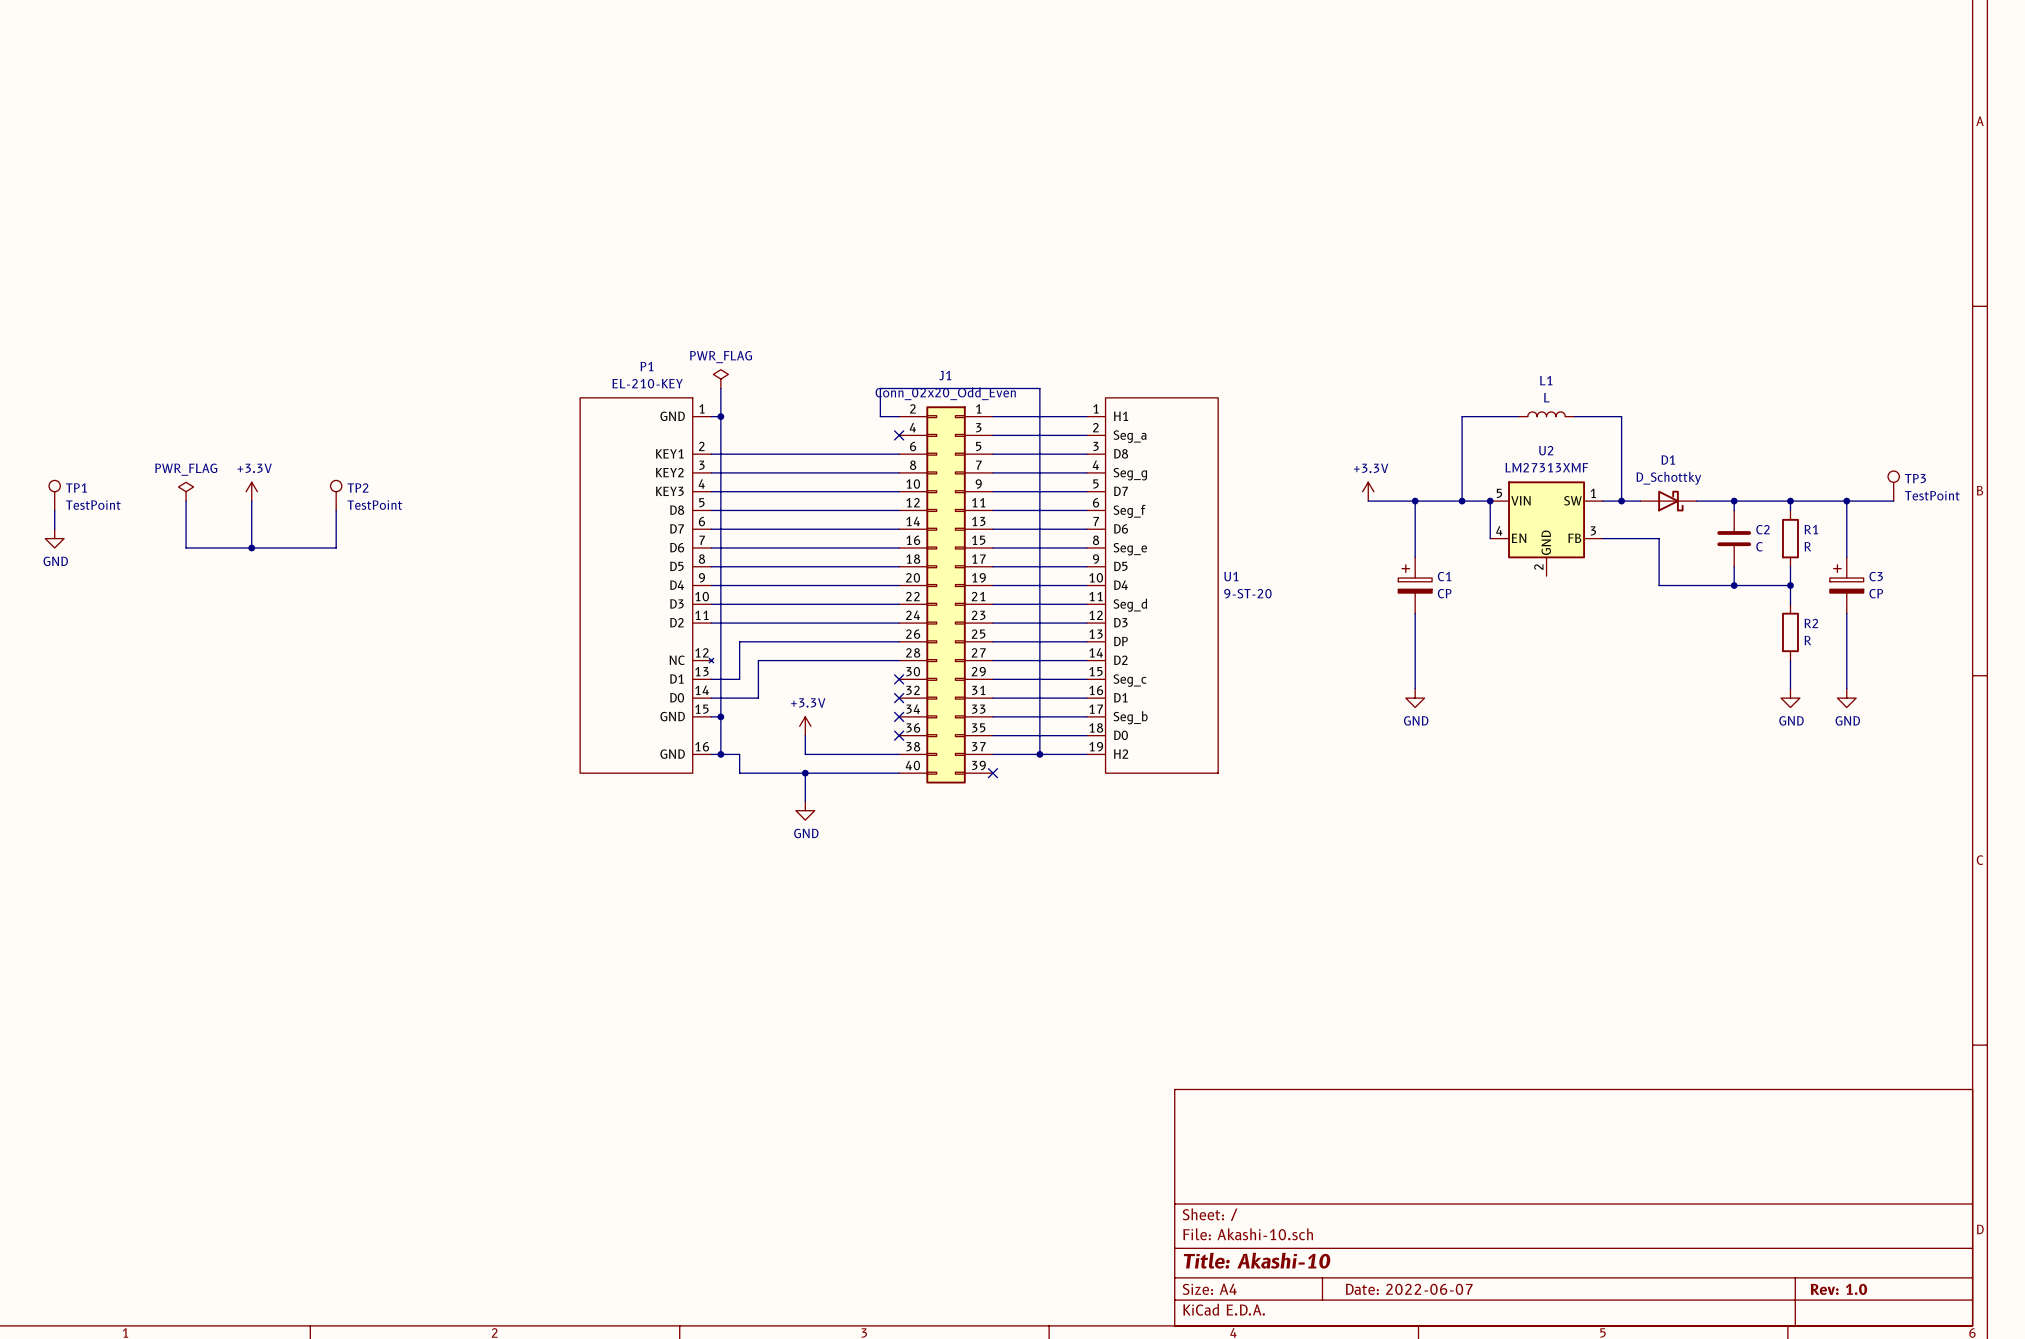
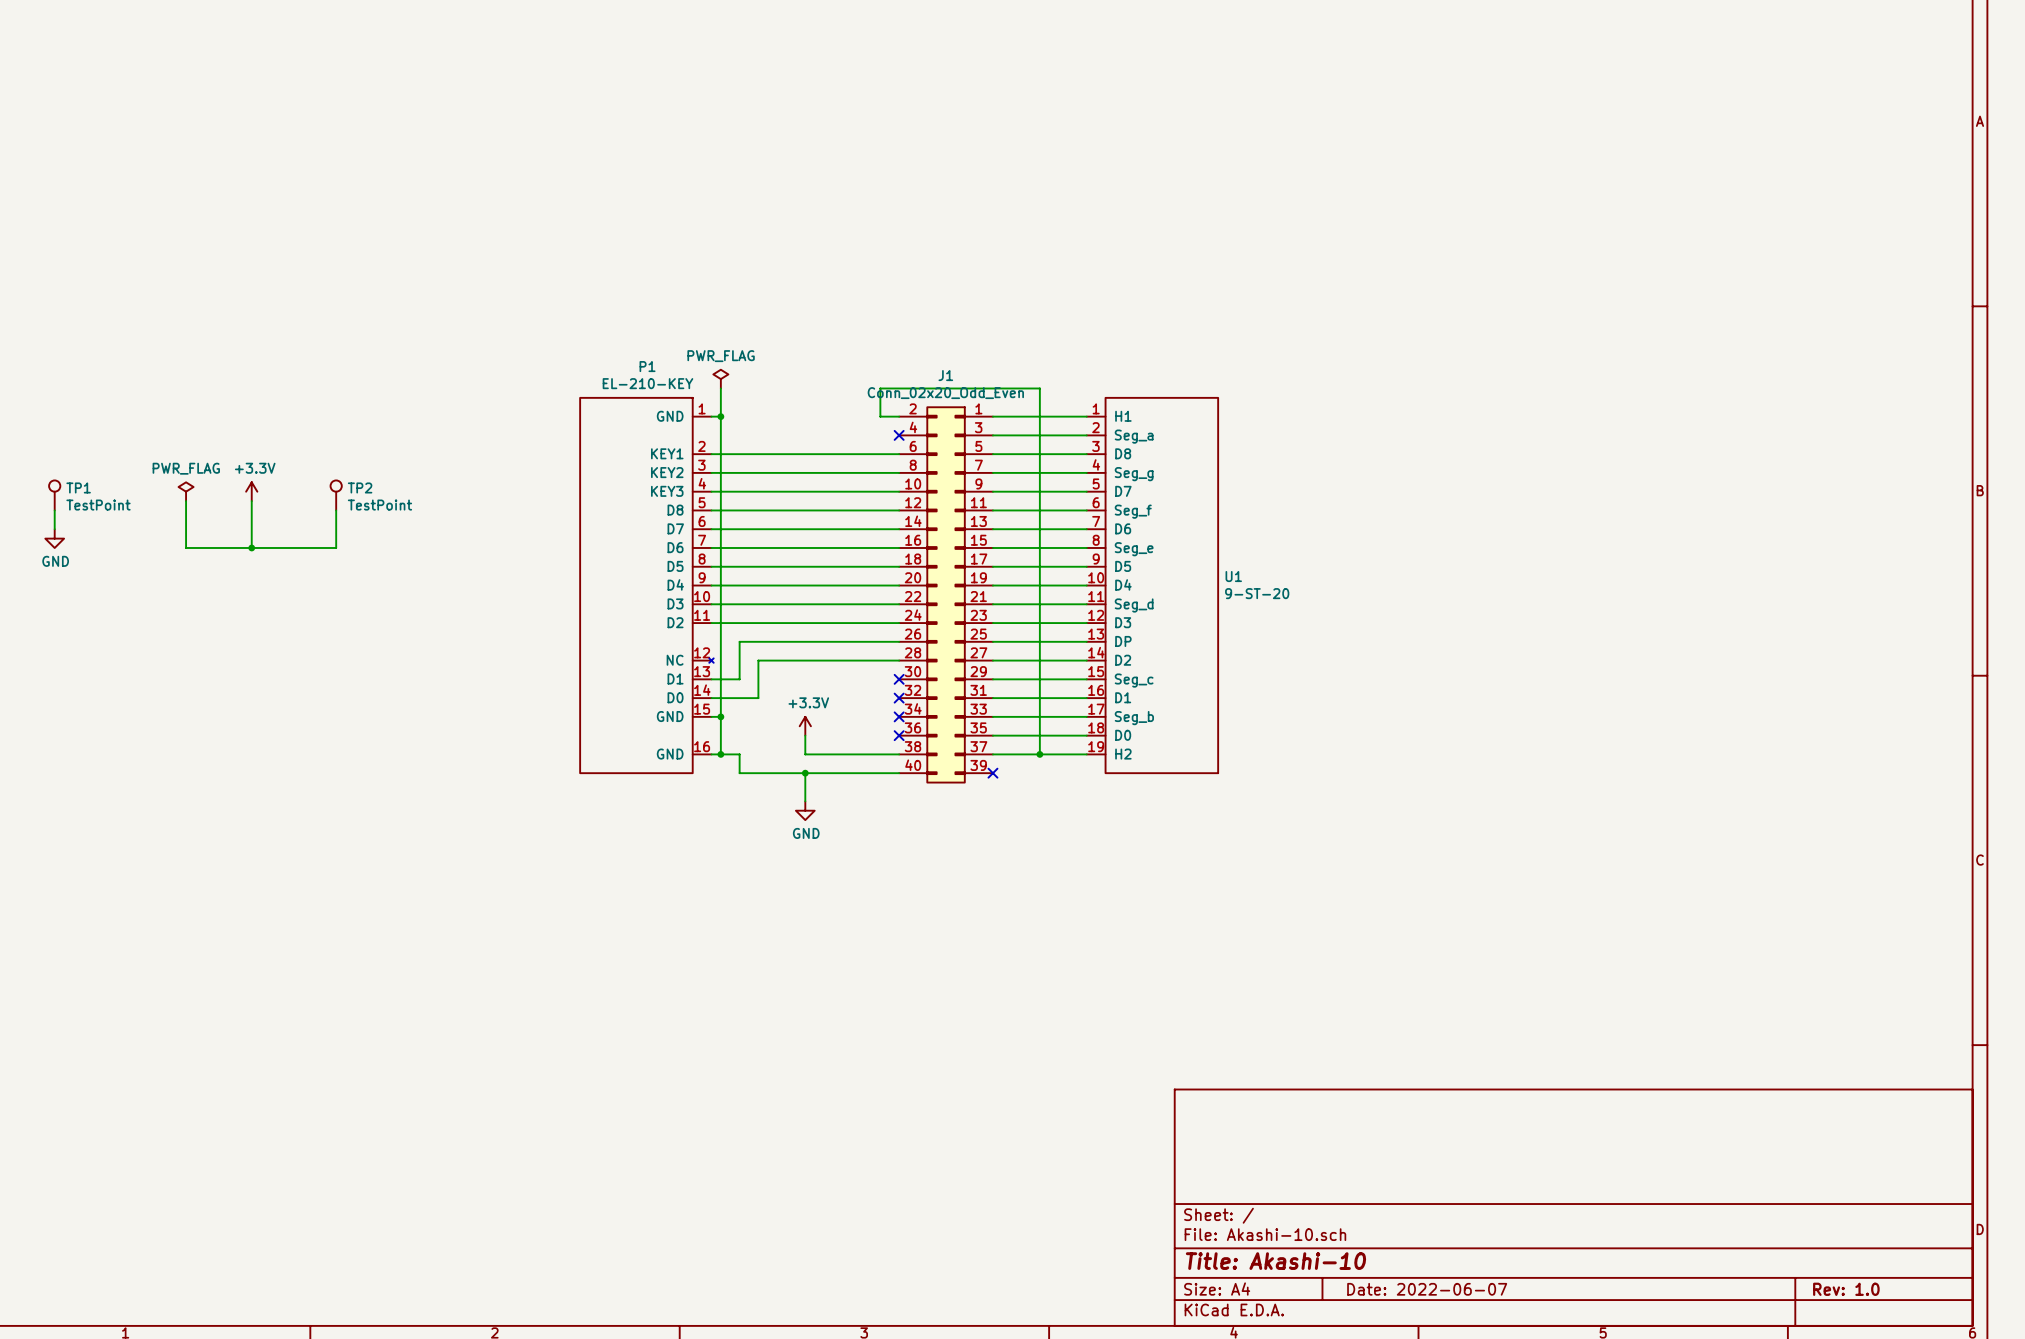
L1: L (1546, 414) -> none
wire: (1518, 416) (1462, 416) (1462, 501) -> none
wire: (1574, 416) (1621, 416) (1621, 501) -> none
TP3: TestPoint (1893, 486) -> none
power symbol: +3.3V (1368, 491) -> none
wire: (1368, 501) (1490, 501) (1490, 538) -> none
wire: (1415, 501) (1415, 557) -> none
junction: (1415, 501) -> none
junction: (1462, 501) -> none
junction: (1490, 501) -> none
wire: (1602, 501) (1640, 501) -> none
junction: (1621, 501) -> none
D1: D_Schottky (1668, 501) -> none
wire: (1696, 501) (1893, 501) -> none
wire: (1734, 501) (1734, 510) -> none
junction: (1734, 501) -> none
wire: (1790, 501) (1790, 510) -> none
junction: (1790, 501) -> none
wire: (1846, 501) (1846, 557) -> none
junction: (1846, 501) -> none
U2: LM27313XMF (1546, 528) -> none
wire: (1602, 538) (1659, 538) (1659, 585) (1790, 585) -> none
C2: C (1734, 538) -> none
R1: R (1790, 538) -> none
wire: (1734, 566) (1734, 585) -> none
wire: (1790, 566) (1790, 604) -> none
C1: CP (1415, 585) -> none
junction: (1734, 585) -> none
junction: (1790, 585) -> none
C3: CP (1846, 585) -> none
wire: (1415, 613) (1415, 688) -> none
wire: (1846, 613) (1846, 688) -> none
R2: R (1790, 632) -> none
wire: (1790, 660) (1790, 688) -> none
power symbol: GND (1415, 698) -> none
power symbol: GND (1790, 698) -> none
power symbol: GND (1846, 698) -> none

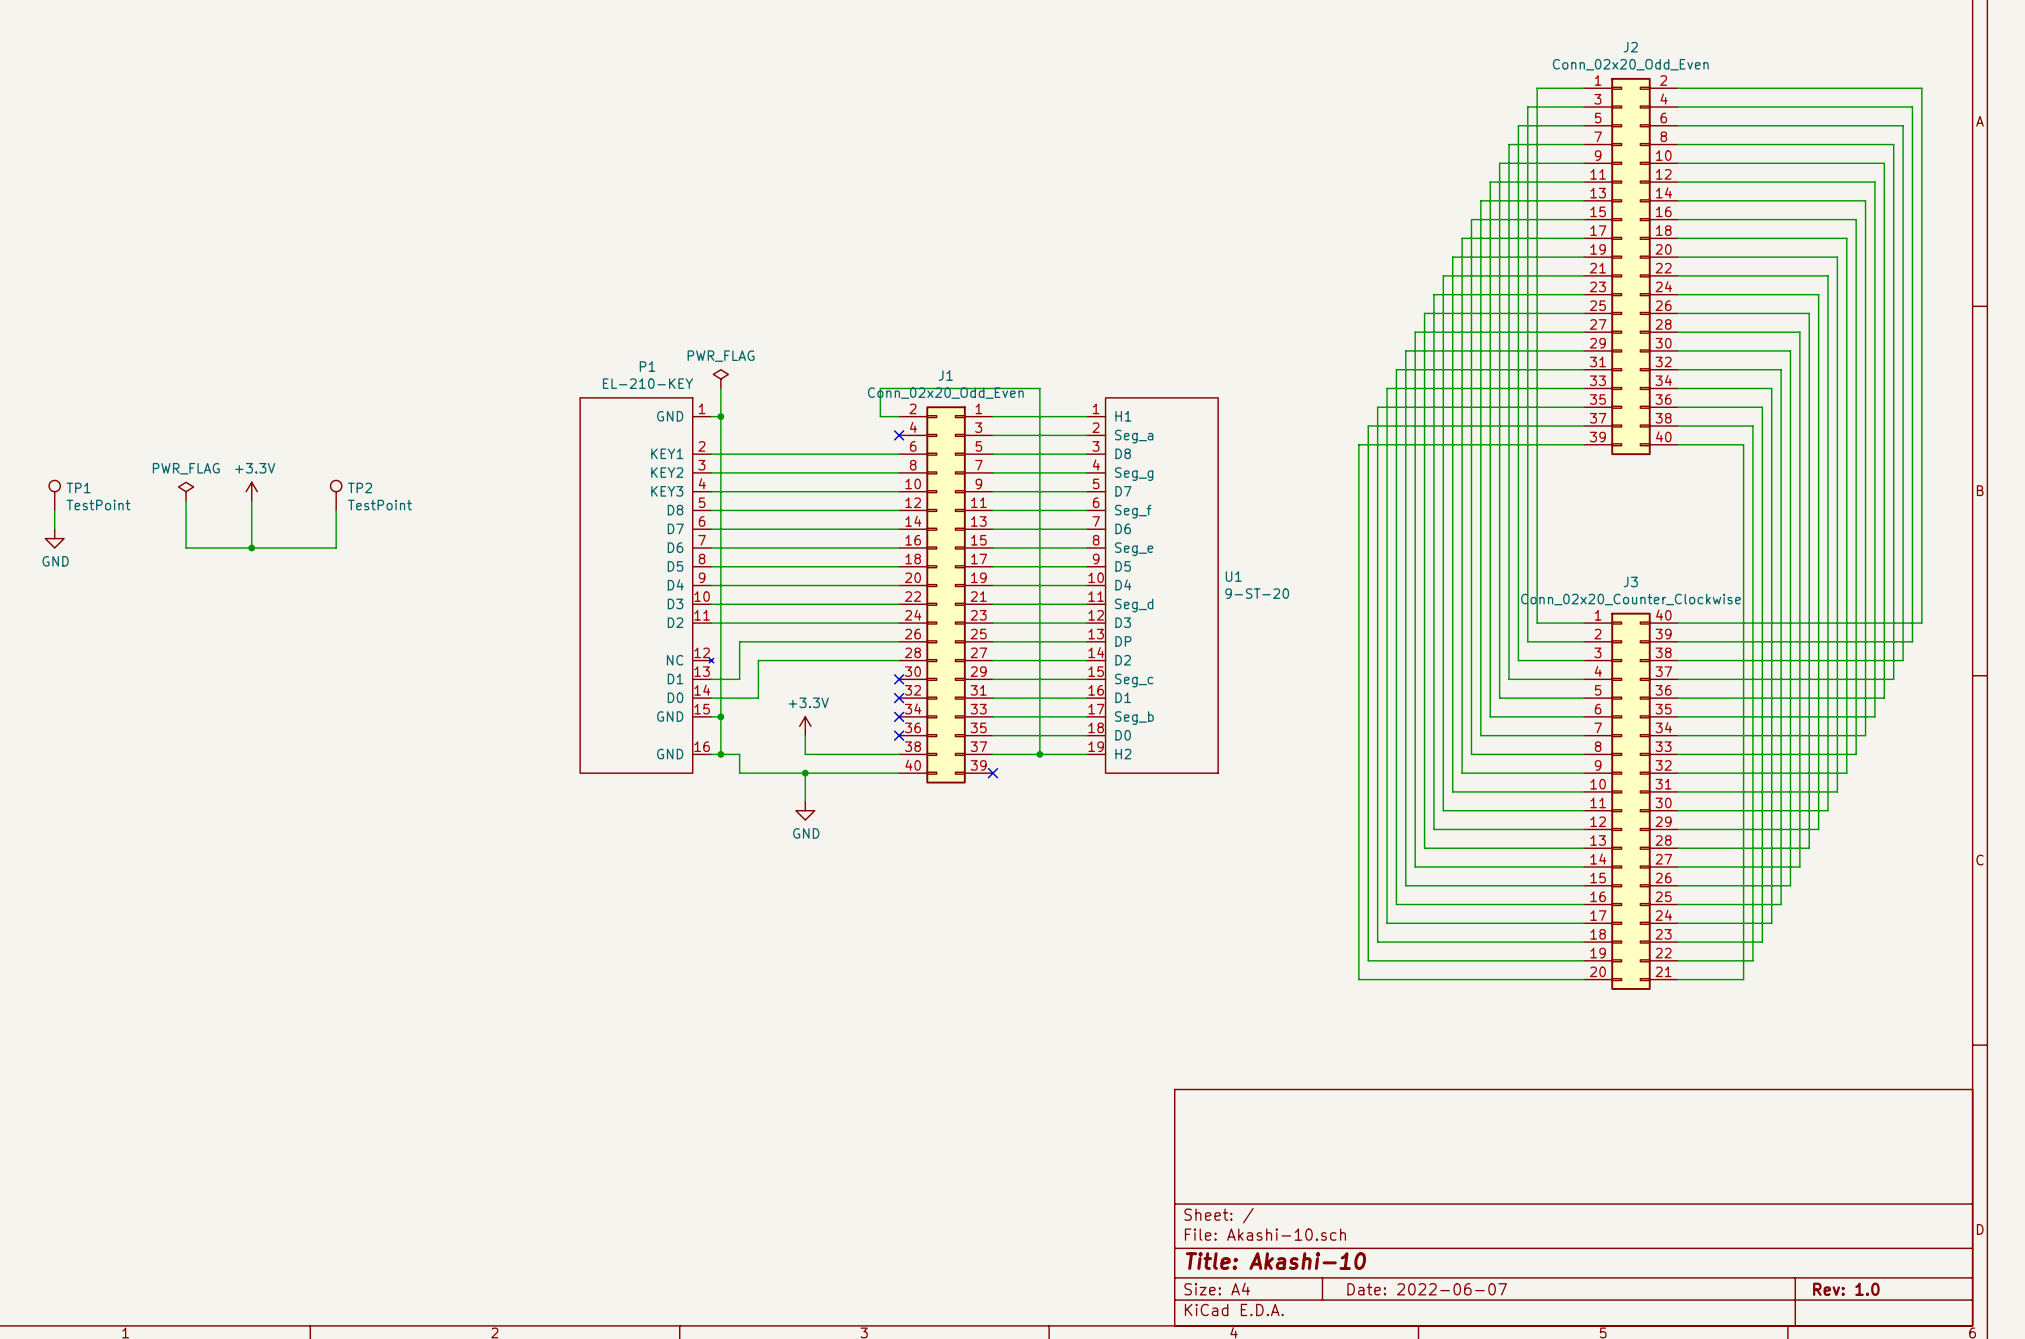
wire: none -> (1584, 88) (1537, 88) (1537, 623) (1584, 623)
wire: none -> (1677, 88) (1921, 88) (1921, 623) (1677, 623)
wire: none -> (1584, 107) (1527, 107) (1527, 641) (1584, 641)
wire: none -> (1677, 107) (1912, 107) (1912, 641) (1677, 641)
wire: none -> (1584, 125) (1518, 125) (1518, 660) (1584, 660)
wire: none -> (1677, 125) (1903, 125) (1903, 660) (1677, 660)
wire: none -> (1584, 144) (1509, 144) (1509, 679) (1584, 679)
wire: none -> (1677, 144) (1893, 144) (1893, 679) (1677, 679)
wire: none -> (1584, 163) (1499, 163) (1499, 698) (1584, 698)
wire: none -> (1677, 163) (1884, 163) (1884, 698) (1677, 698)
wire: none -> (1584, 182) (1490, 182) (1490, 716) (1584, 716)
wire: none -> (1677, 182) (1874, 182) (1874, 716) (1677, 716)
wire: none -> (1584, 200) (1480, 200) (1480, 735) (1584, 735)
wire: none -> (1677, 200) (1865, 200) (1865, 735) (1677, 735)
wire: none -> (1584, 219) (1471, 219) (1471, 754) (1584, 754)
wire: none -> (1677, 219) (1856, 219) (1856, 754) (1677, 754)
wire: none -> (1584, 238) (1462, 238) (1462, 773) (1584, 773)
wire: none -> (1677, 238) (1846, 238) (1846, 773) (1677, 773)
wire: none -> (1584, 257) (1452, 257) (1452, 791) (1584, 791)
wire: none -> (1677, 257) (1837, 257) (1837, 791) (1677, 791)
J2: none -> Conn_02x20_Odd_Even (1630, 266)
wire: none -> (1584, 275) (1443, 275) (1443, 810) (1584, 810)
wire: none -> (1677, 275) (1828, 275) (1828, 810) (1677, 810)
wire: none -> (1584, 294) (1433, 294) (1433, 829) (1584, 829)
wire: none -> (1677, 294) (1818, 294) (1818, 829) (1677, 829)
wire: none -> (1584, 313) (1424, 313) (1424, 848) (1584, 848)
wire: none -> (1677, 313) (1809, 313) (1809, 848) (1677, 848)
wire: none -> (1584, 332) (1415, 332) (1415, 867) (1584, 867)
wire: none -> (1677, 332) (1799, 332) (1799, 867) (1677, 867)
wire: none -> (1584, 350) (1405, 350) (1405, 885) (1584, 885)
wire: none -> (1677, 350) (1790, 350) (1790, 885) (1677, 885)
wire: none -> (1584, 369) (1396, 369) (1396, 904) (1584, 904)
wire: none -> (1677, 369) (1781, 369) (1781, 904) (1677, 904)
wire: none -> (1584, 388) (1387, 388) (1387, 923) (1584, 923)
wire: none -> (1677, 388) (1771, 388) (1771, 923) (1677, 923)
wire: none -> (1584, 407) (1377, 407) (1377, 942) (1584, 942)
wire: none -> (1677, 407) (1762, 407) (1762, 942) (1677, 942)
wire: none -> (1584, 426) (1368, 426) (1368, 960) (1584, 960)
wire: none -> (1677, 426) (1752, 426) (1752, 960) (1677, 960)
wire: none -> (1584, 444) (1358, 444) (1358, 979) (1584, 979)
wire: none -> (1677, 444) (1743, 444) (1743, 979) (1677, 979)
J3: none -> Conn_02x20_Counter_Clockwise (1630, 801)

